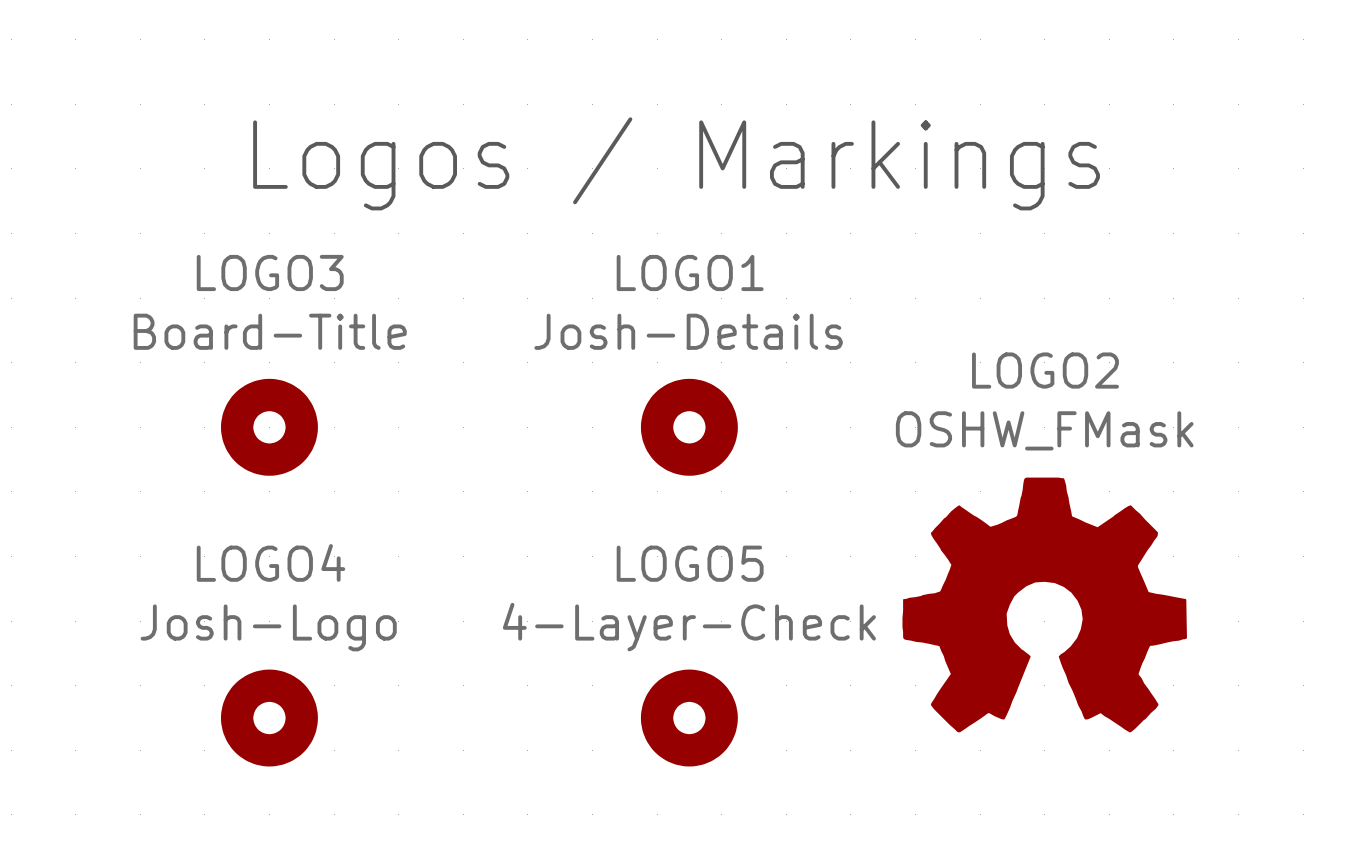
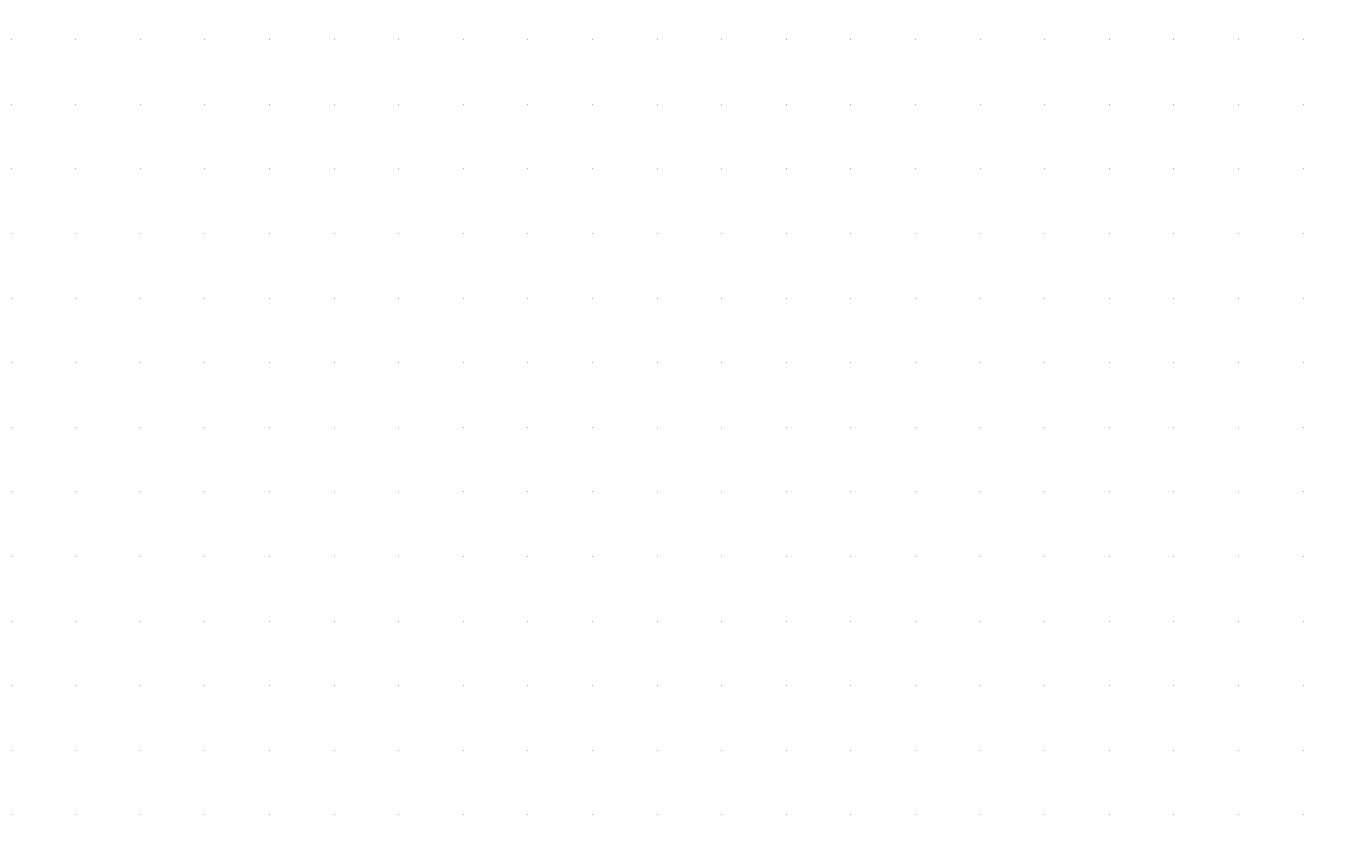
text: Logos / Markings (676, 163) -> none
LOGO3: Board-Title (269, 427) -> none
LOGO1: Josh-Details (689, 427) -> none
LOGO2: OSHW_FMask (1044, 604) -> none
LOGO4: Josh-Logo (269, 718) -> none
LOGO5: 4-Layer-Check (689, 718) -> none

